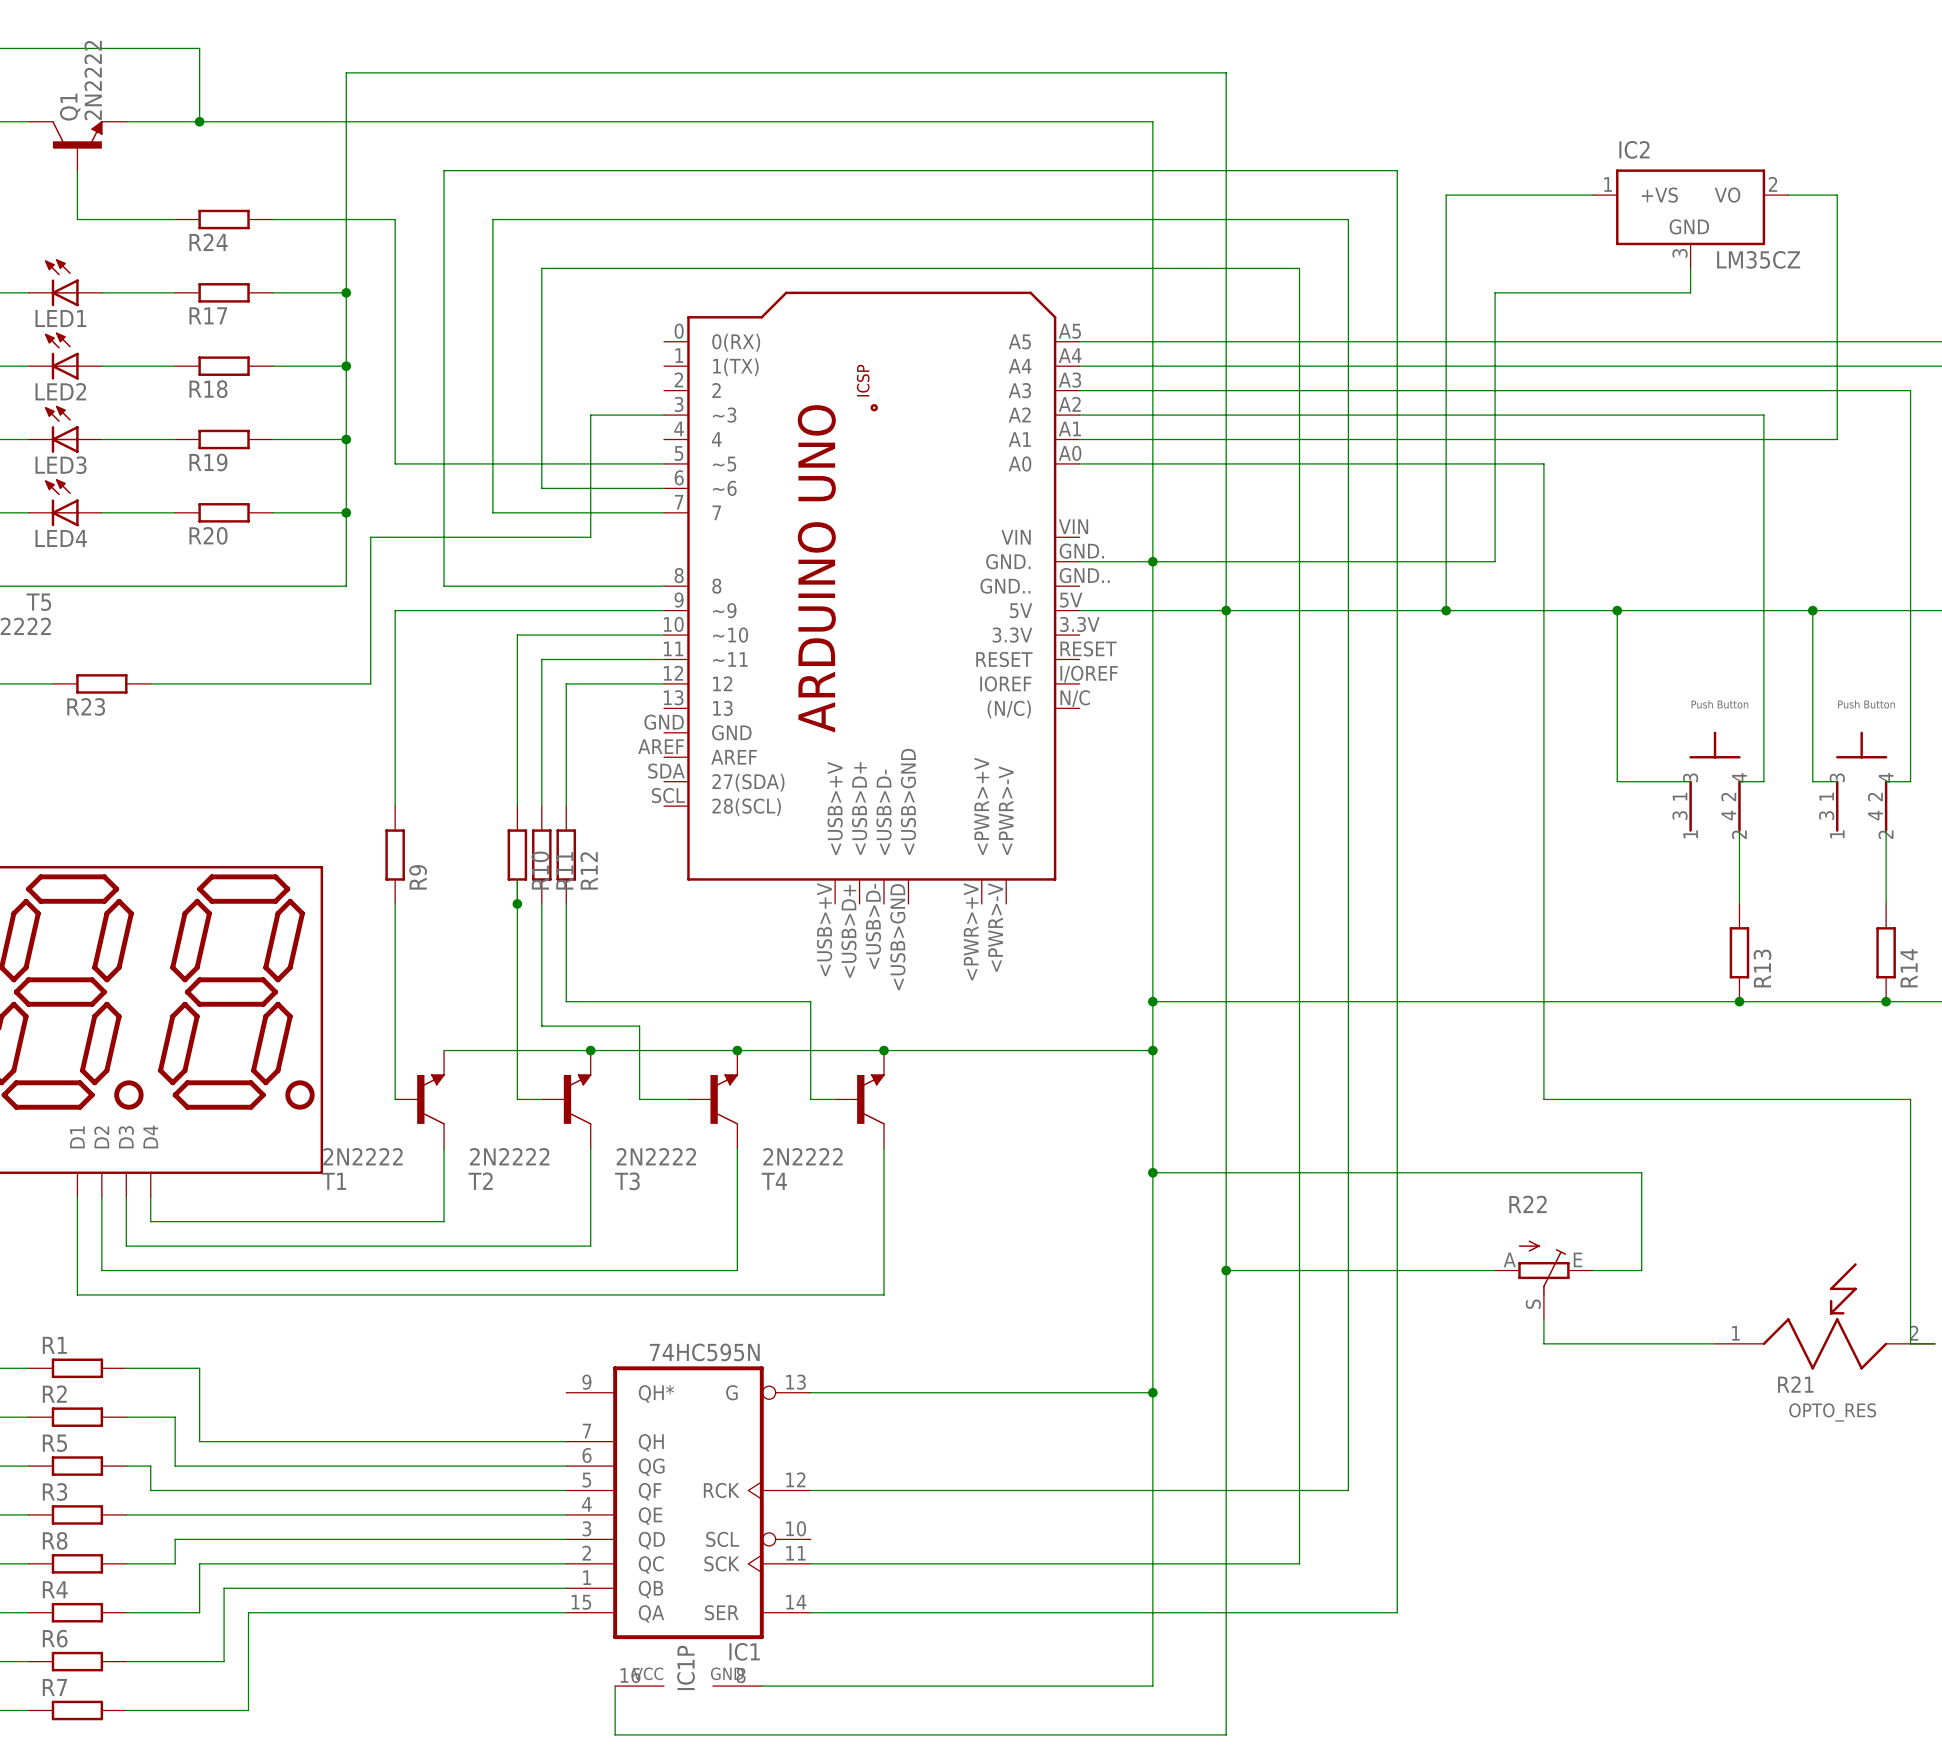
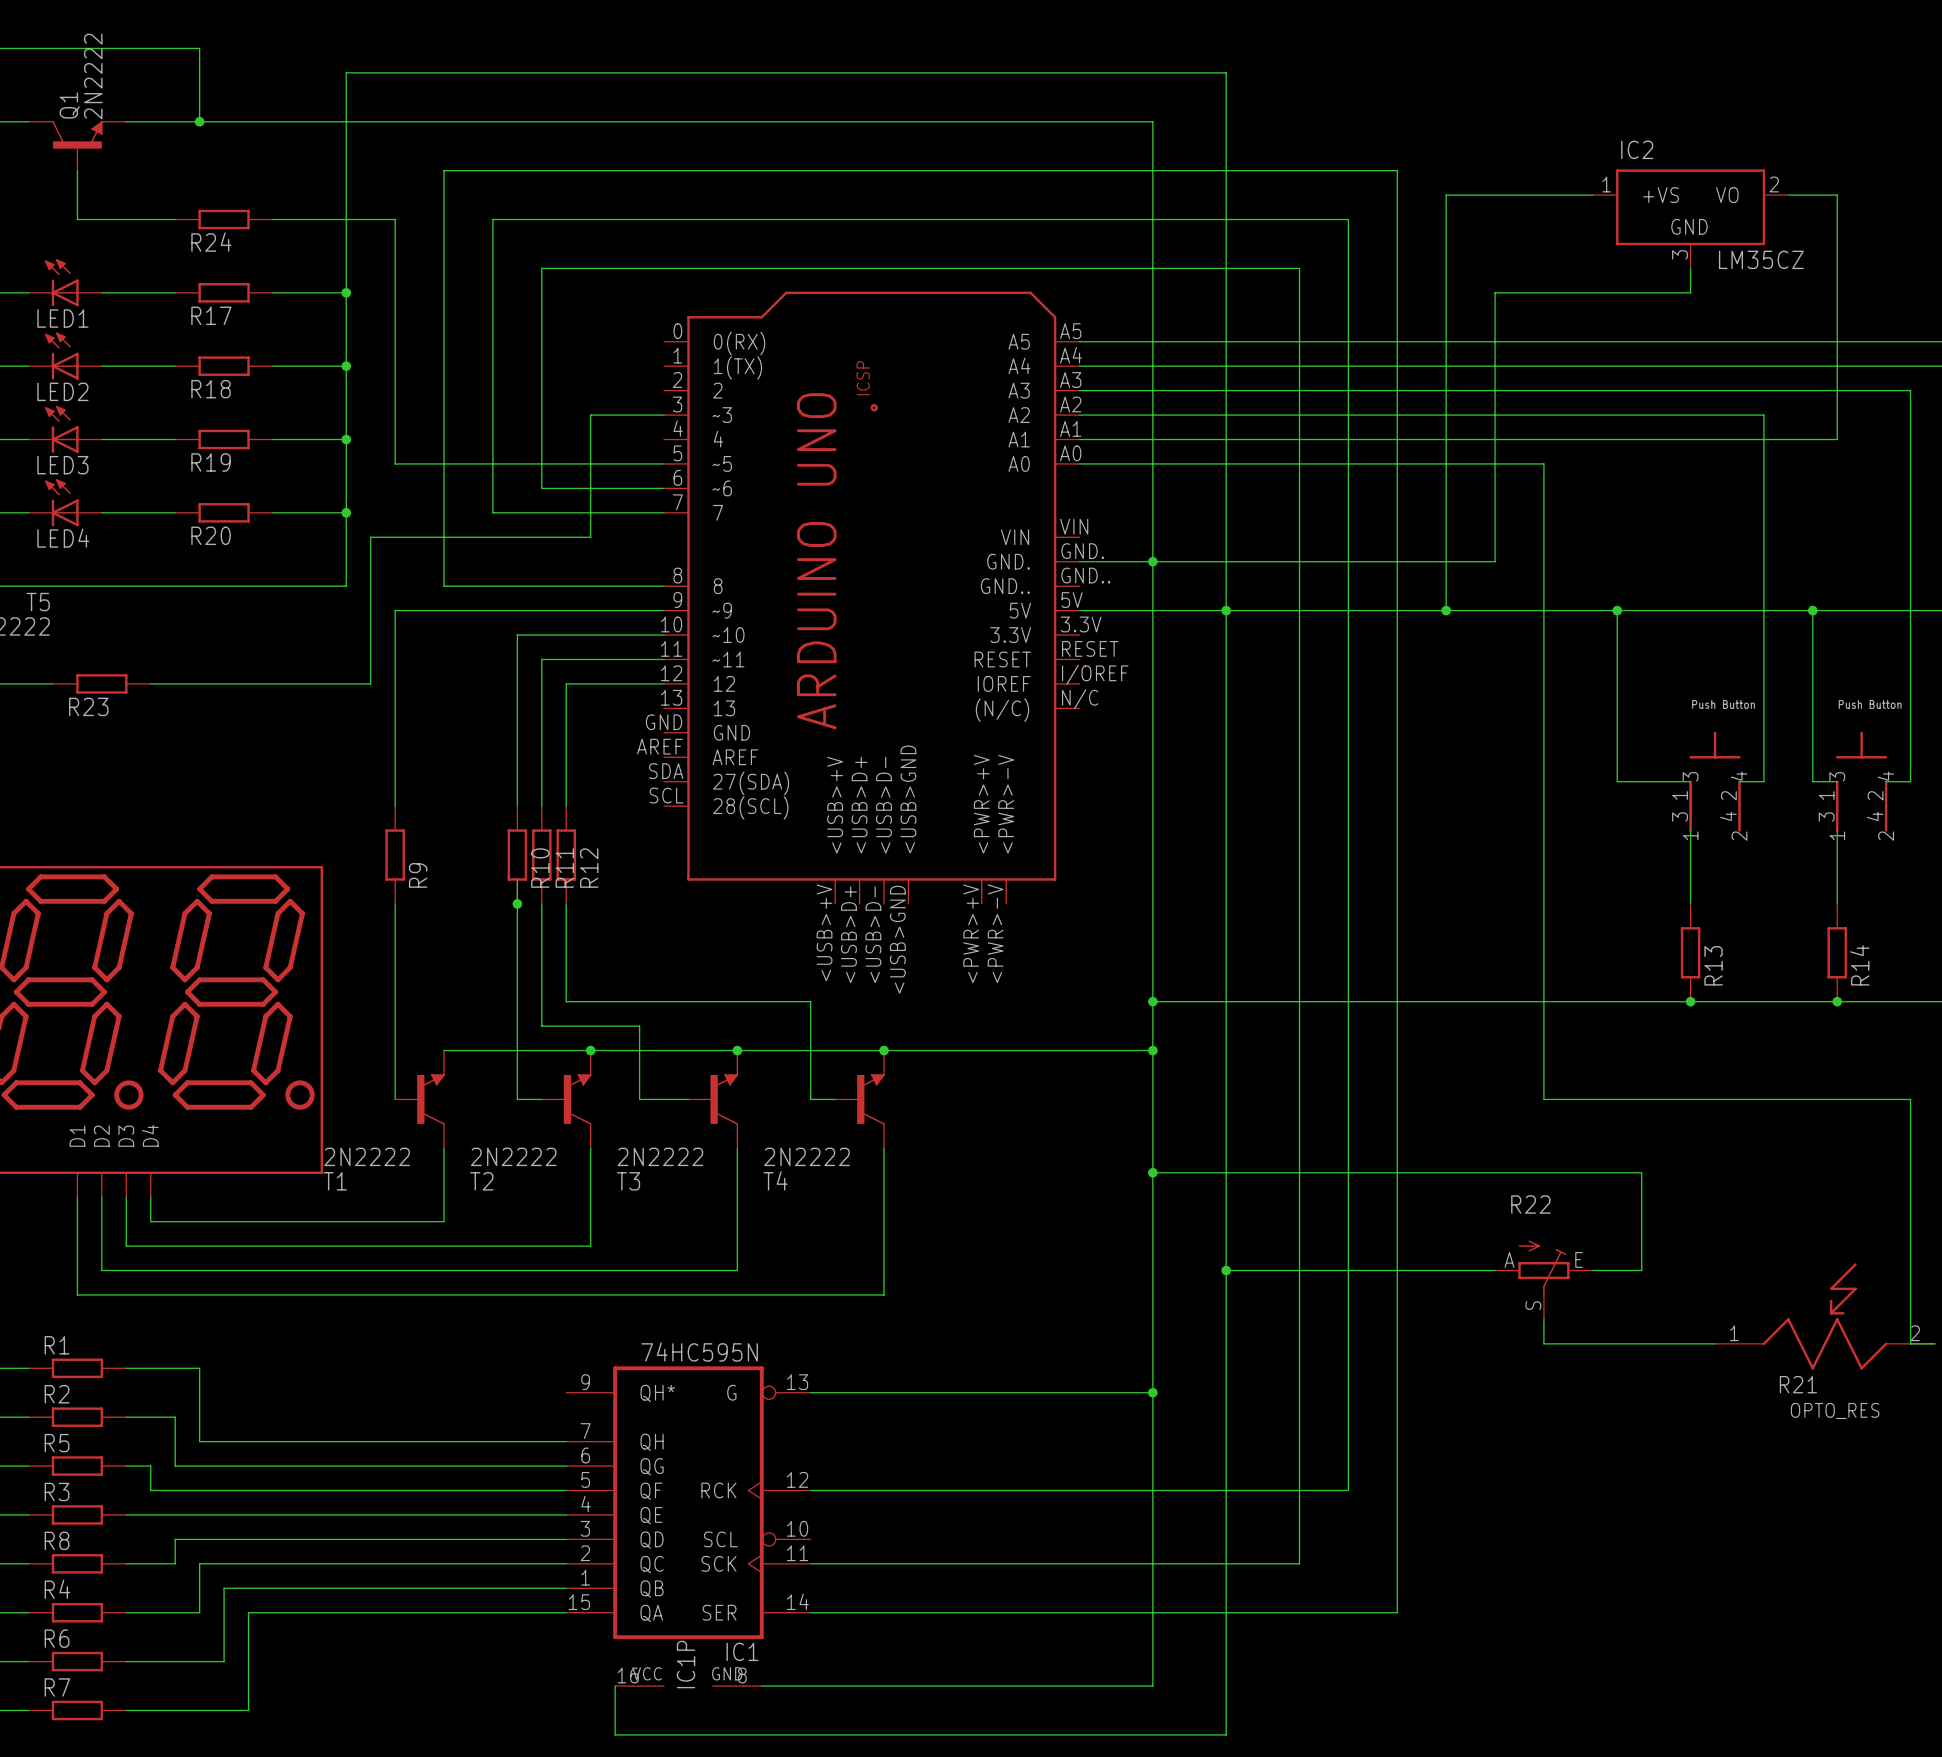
wire: (1739, 830) (1739, 903) -> (1690, 830) (1690, 903)
wire: (1886, 830) (1886, 903) -> (1837, 830) (1837, 903)
R13 position: (1739, 952) -> (1690, 952)
R14 position: (1886, 952) -> (1837, 952)
junction: none -> (1690, 1001)
junction: (1739, 1001) -> none
junction: none -> (1837, 1001)
junction: (1886, 1001) -> none

